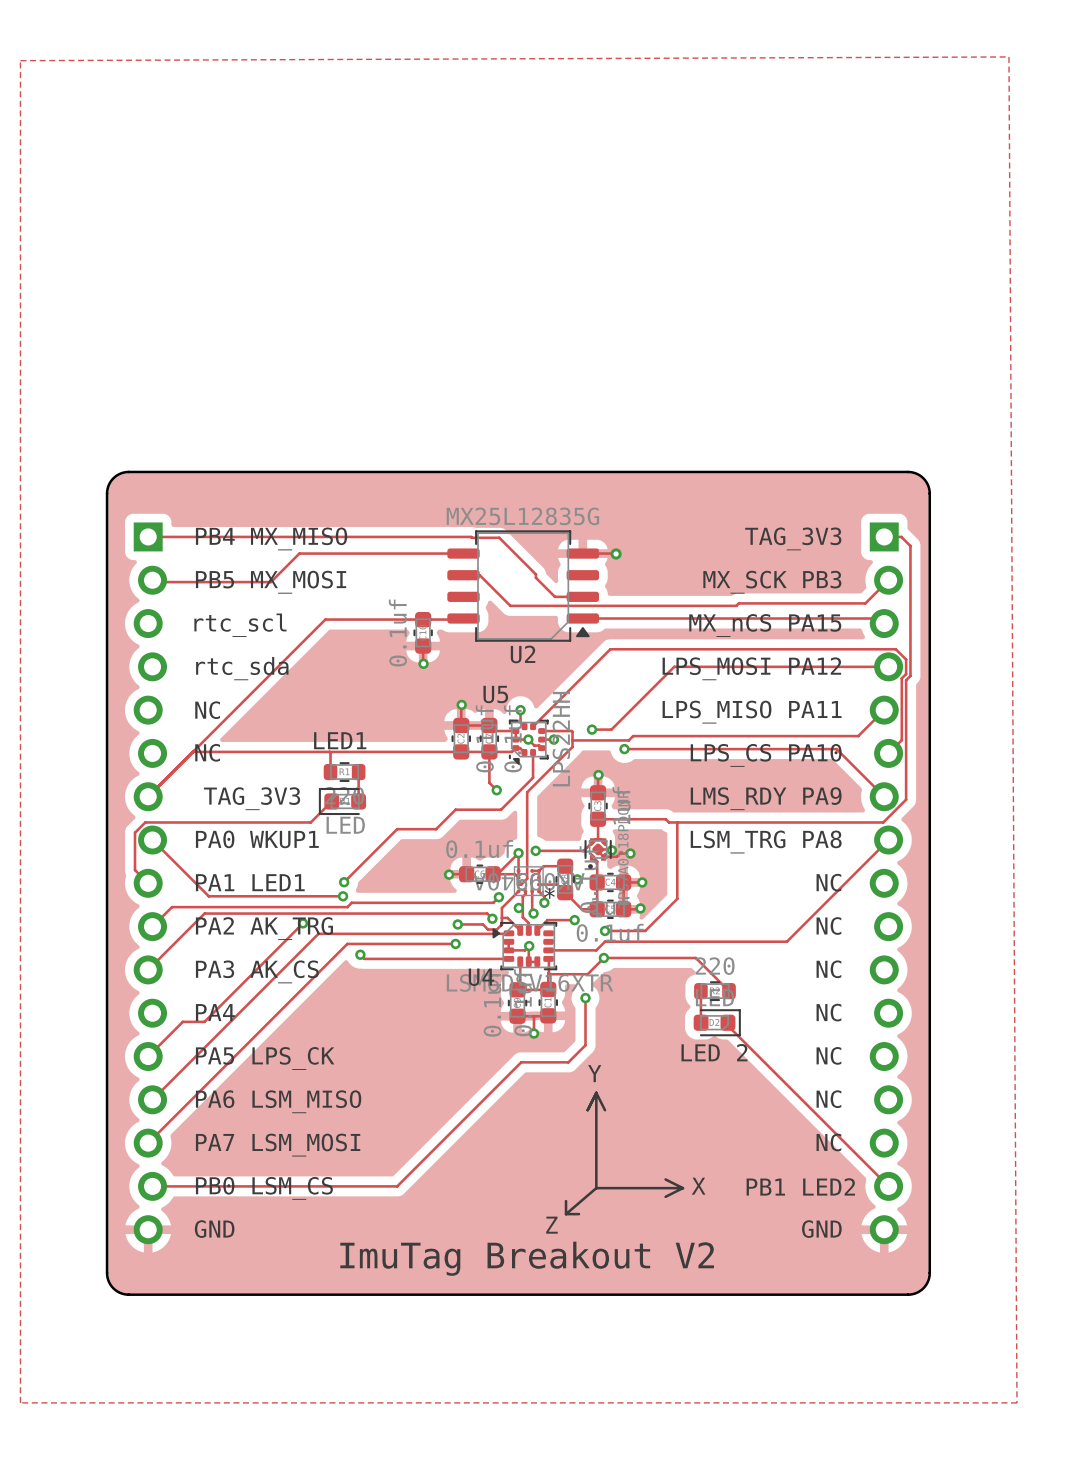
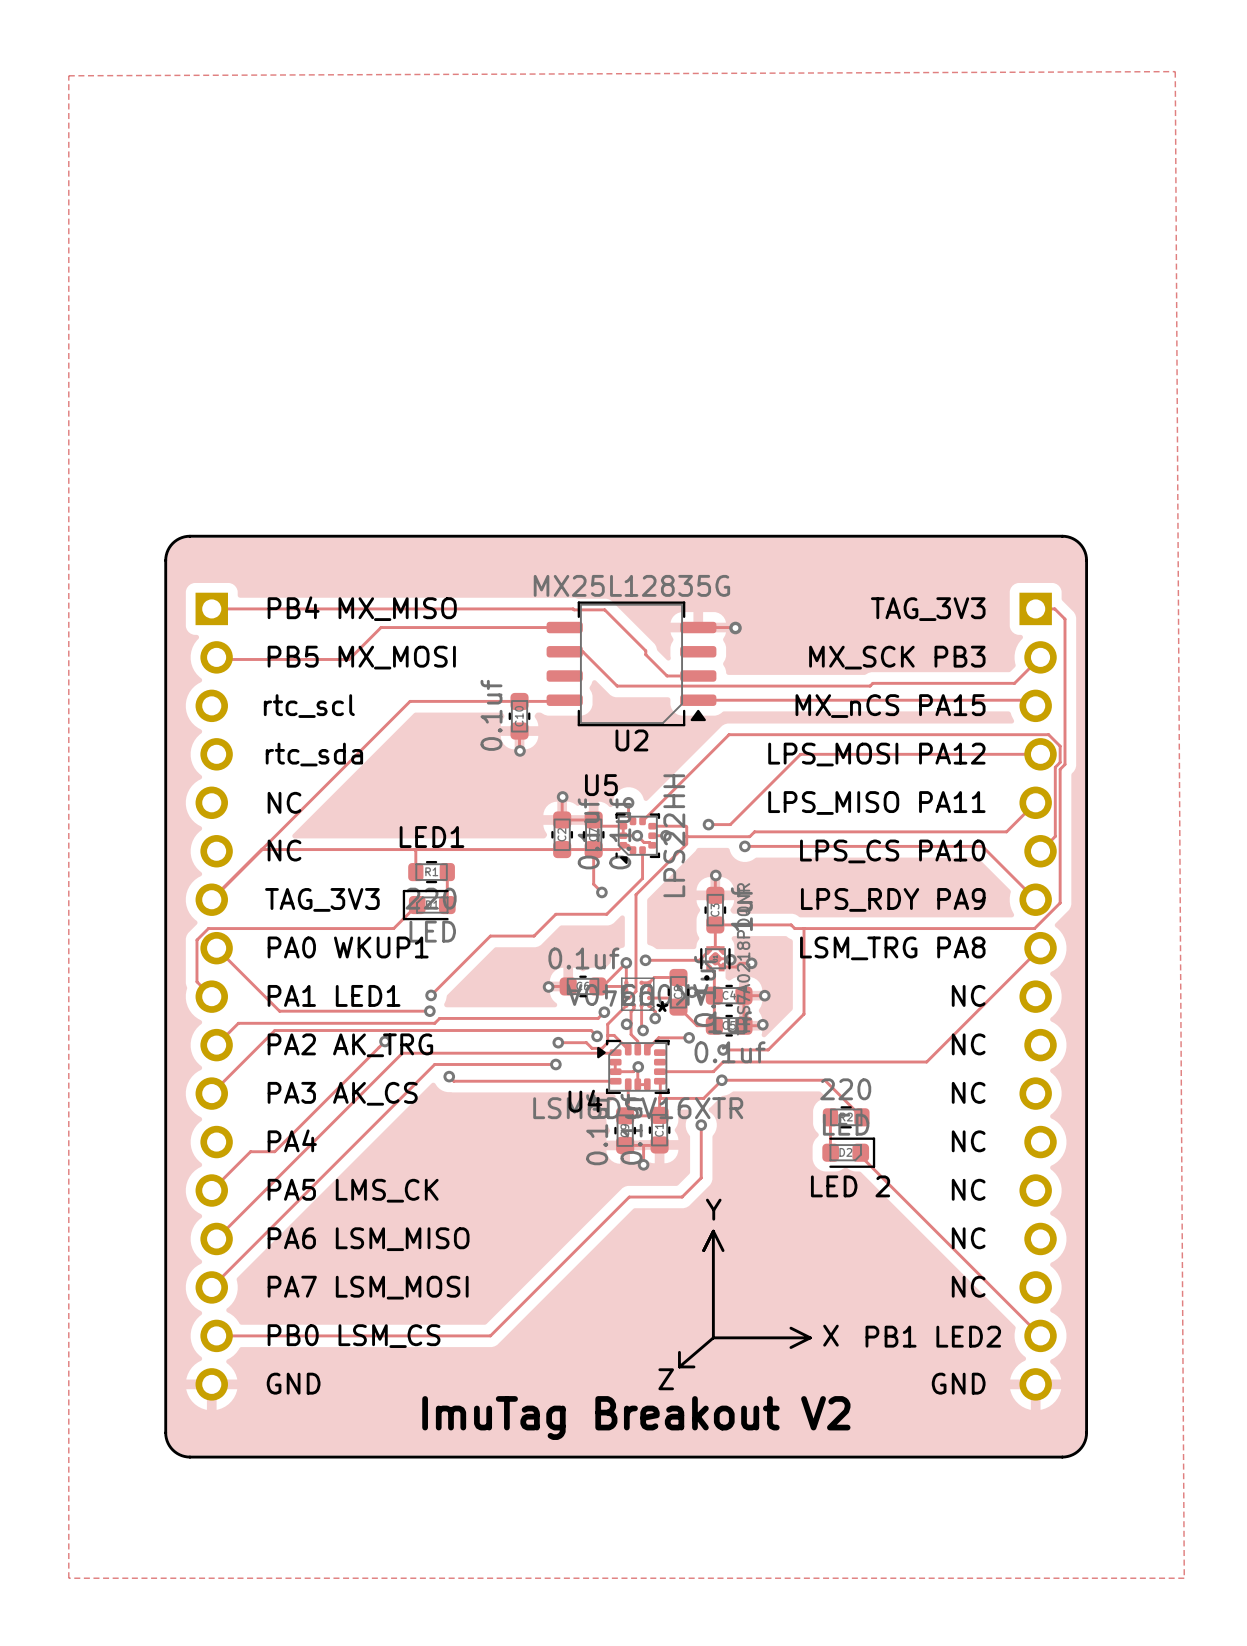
text: LMS_RDY PA9 (766, 798) -> LPS_RDY PA9 (893, 899)
text: PA5 LPS_CK (265, 1058) -> PA5 LMS_CK (353, 1190)

